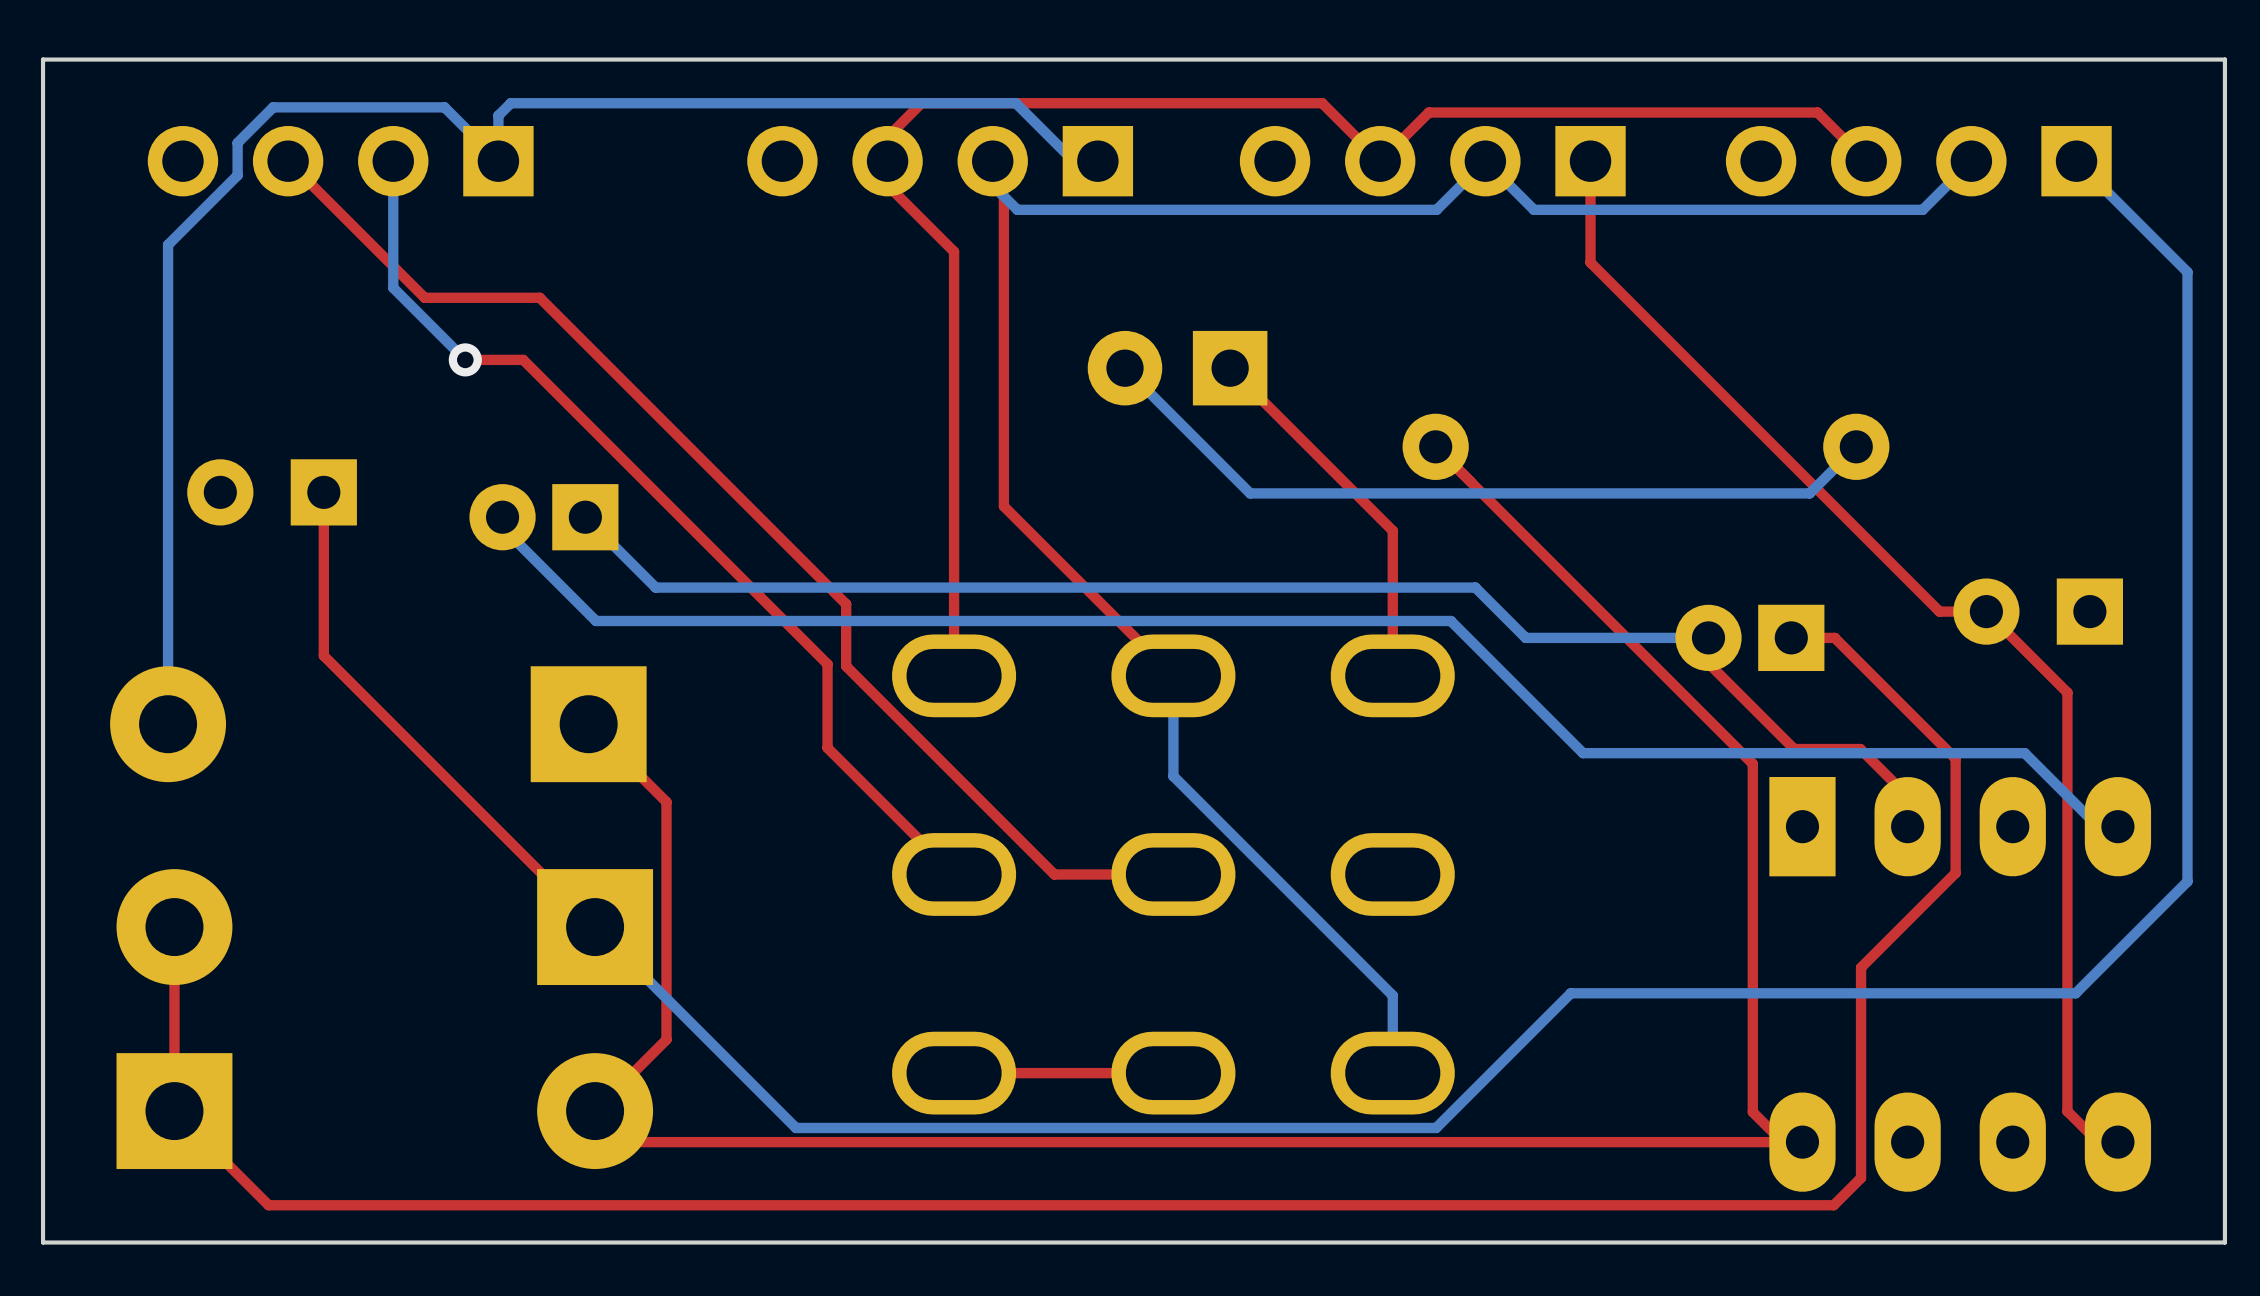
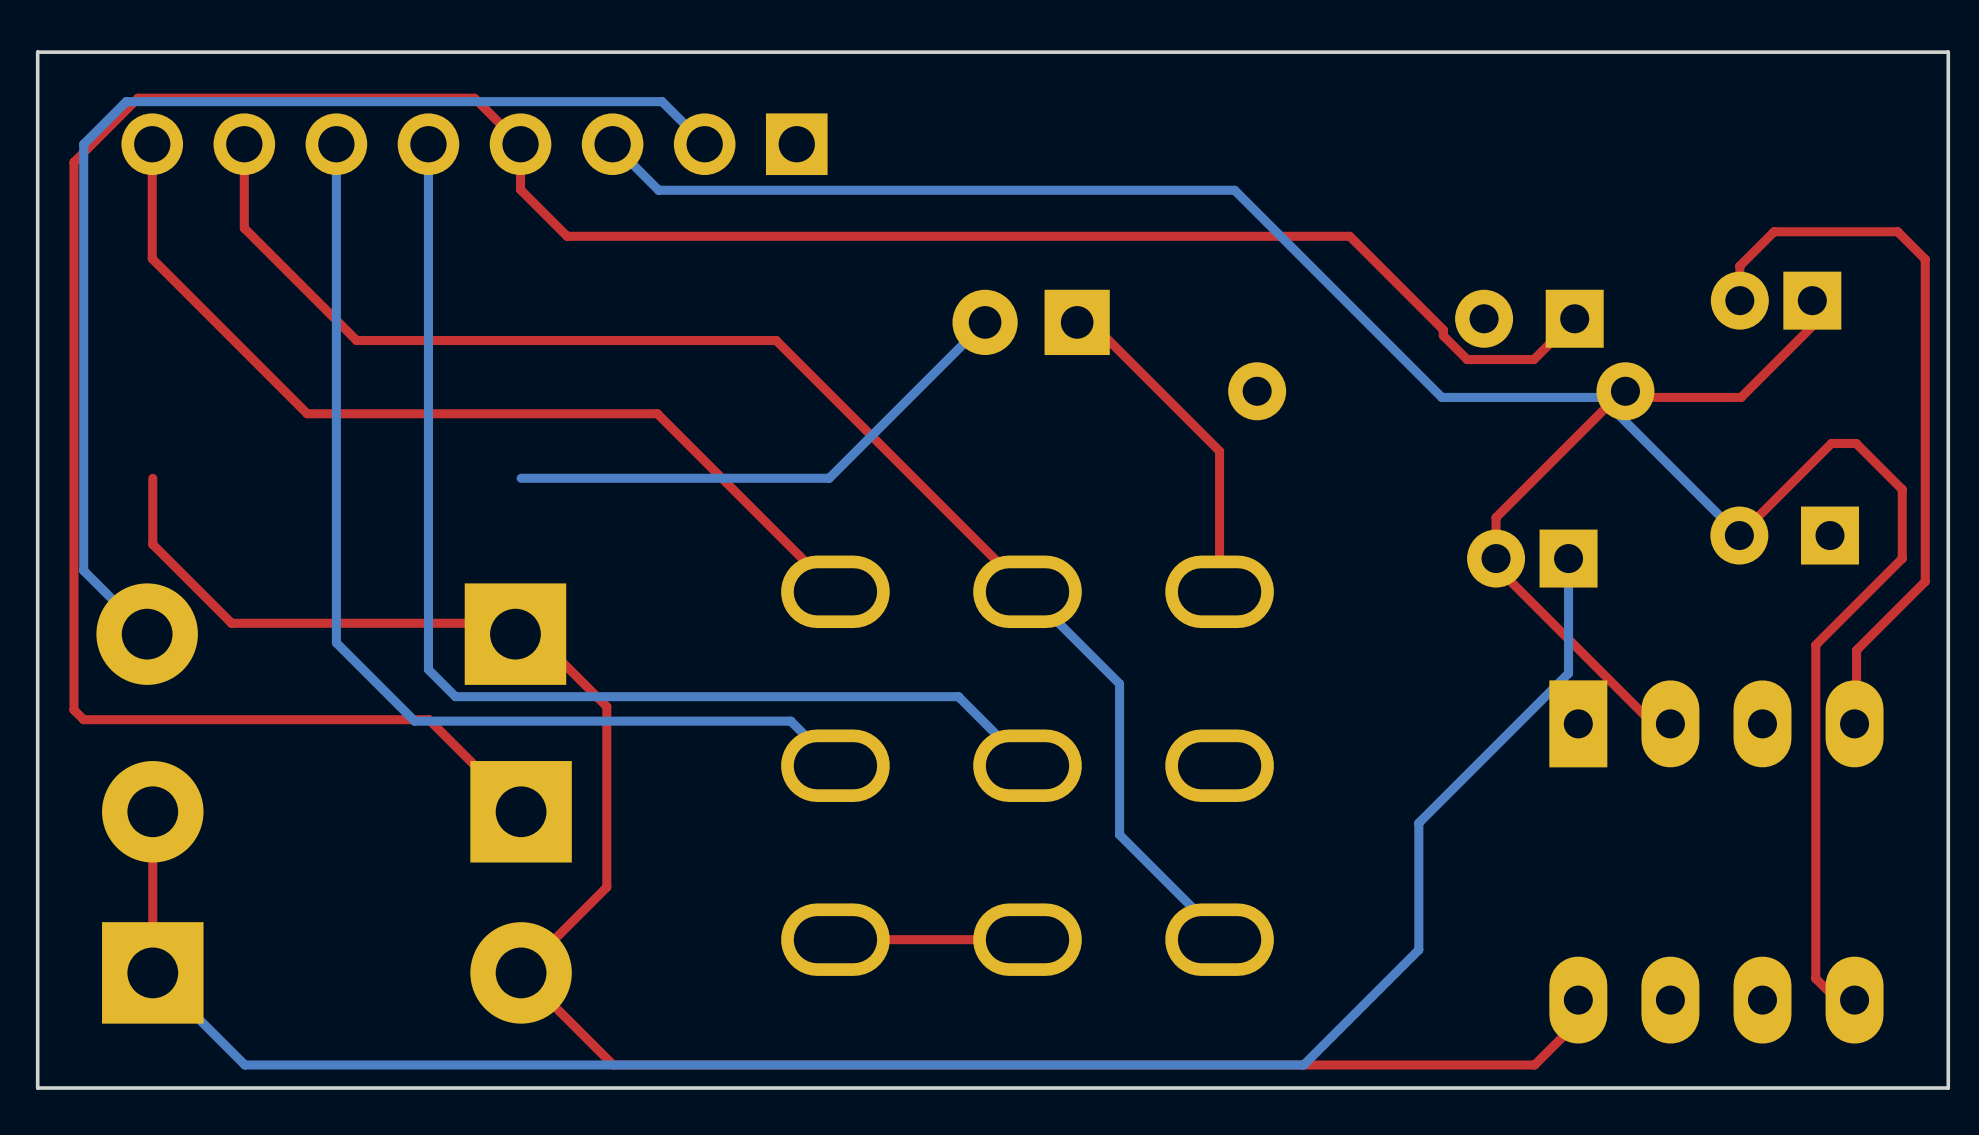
top track: (288, 161) (424, 297) (539, 297) (846, 604) (846, 666) (1054, 874) (1173, 874) -> none
part: (340, 161) -> none
bottom track: (393, 161) (393, 287) (465, 359) -> none
part: (940, 161) -> none
top track: (968, 161) (1003, 196) (1003, 506) -> (244, 144) (244, 228) (356, 340) (776, 340) (879, 443)
bottom track: (1073, 161) (1015, 103) (510, 103) (498, 115) (498, 161) (444, 107) (273, 107) (237, 142) (237, 175) (168, 244) (168, 724) -> (704, 144) (662, 101) (126, 101) (83, 144) (83, 570) (147, 634)
part: (1432, 161) -> none
top track: (1590, 161) (1590, 262) (1939, 611) (1986, 611) (2067, 692) (2067, 1111) (2073, 1117) -> (1739, 535) (1831, 443) (1856, 443) (1902, 489) (1902, 558) (1815, 645) (1815, 978)
top track: (1866, 161) (1817, 112) (1428, 112) (1380, 161) (1322, 103) (921, 103) (863, 161) (954, 251) (954, 675) -> (152, 144) (152, 258) (307, 413) (657, 413) (835, 591)
part: (1918, 161) -> none
bottom track: (1971, 161) (1922, 209) (1534, 209) (1485, 161) (1436, 209) (1017, 209) (968, 161) -> none
bottom track: (2076, 161) (2187, 272) (2187, 881) (2075, 993) (1570, 993) (1436, 1127) (796, 1127) (595, 927) -> none
bottom track: none -> (336, 144) (336, 642) (414, 721) (790, 721) (835, 765)
bottom track: none -> (428, 144) (428, 669) (455, 696) (958, 696) (1027, 765)
part: none -> (474, 144)
bottom track: none -> (612, 144) (658, 190) (1234, 190) (1441, 397) (1601, 397) (1739, 535)
top track: none -> (1739, 300) (1739, 266) (1774, 231) (1897, 231) (1925, 259) (1925, 581) (1856, 650) (1856, 743)
part: none -> (1776, 300)
top track: (465, 359) (523, 359) (827, 664) (827, 747) (954, 874) -> none
via: (465, 359) -> none
part: none -> (1529, 318)
bottom track: (1124, 368) (1250, 493) (1809, 493) (1856, 446) -> (985, 322) (829, 478) (521, 478)
top track: (1230, 368) (1392, 530) -> (1073, 305) (1219, 451) (1219, 464)
top track: none -> (1812, 326) (1741, 397) (1616, 397) (1496, 517) (1496, 558)
top track: (1435, 446) (1752, 763) (1752, 1112) (1804, 1164) -> none
part: (272, 492) -> none
top track: (323, 496) (323, 655) (489, 821) -> (1574, 318) (1533, 359) (1467, 359) (1443, 335) (1443, 329) (1349, 236) (567, 236) (520, 189) (520, 144) (474, 98) (138, 98) (73, 162) (73, 709) (83, 719) (429, 719)
bottom track: (502, 517) (502, 527) (595, 620) (1450, 620) (1583, 753) (2024, 753) (2120, 848) -> none
part: (543, 517) -> none
bottom track: (585, 517) (655, 587) (1475, 587) (1525, 637) (1708, 637) -> none
top track: (1705, 627) (1705, 660) (1794, 749) (1860, 749) (1907, 795) (1907, 829) -> none
top track: (1791, 637) (1834, 637) (1955, 758) (1955, 873) (1861, 967) (1861, 1177) (1833, 1205) (268, 1205) (174, 1111) -> none
bottom track: none -> (1568, 558) (1568, 673) (1418, 823) (1418, 949) (1303, 1064) (244, 1064) (152, 972)
top track: none -> (1496, 566) (1672, 743)
bottom track: (1173, 675) (1173, 776) (1392, 995) (1392, 1067) -> (1027, 591) (1119, 683) (1119, 834) (1219, 934)
top track: (588, 724) (666, 802) (666, 1039) -> (152, 478) (152, 544) (231, 623) (523, 623) (606, 706) (606, 887) (583, 910)
top track: (1802, 1142) (626, 1142) -> (1580, 1019) (1534, 1064) (613, 1064) (548, 1000)

